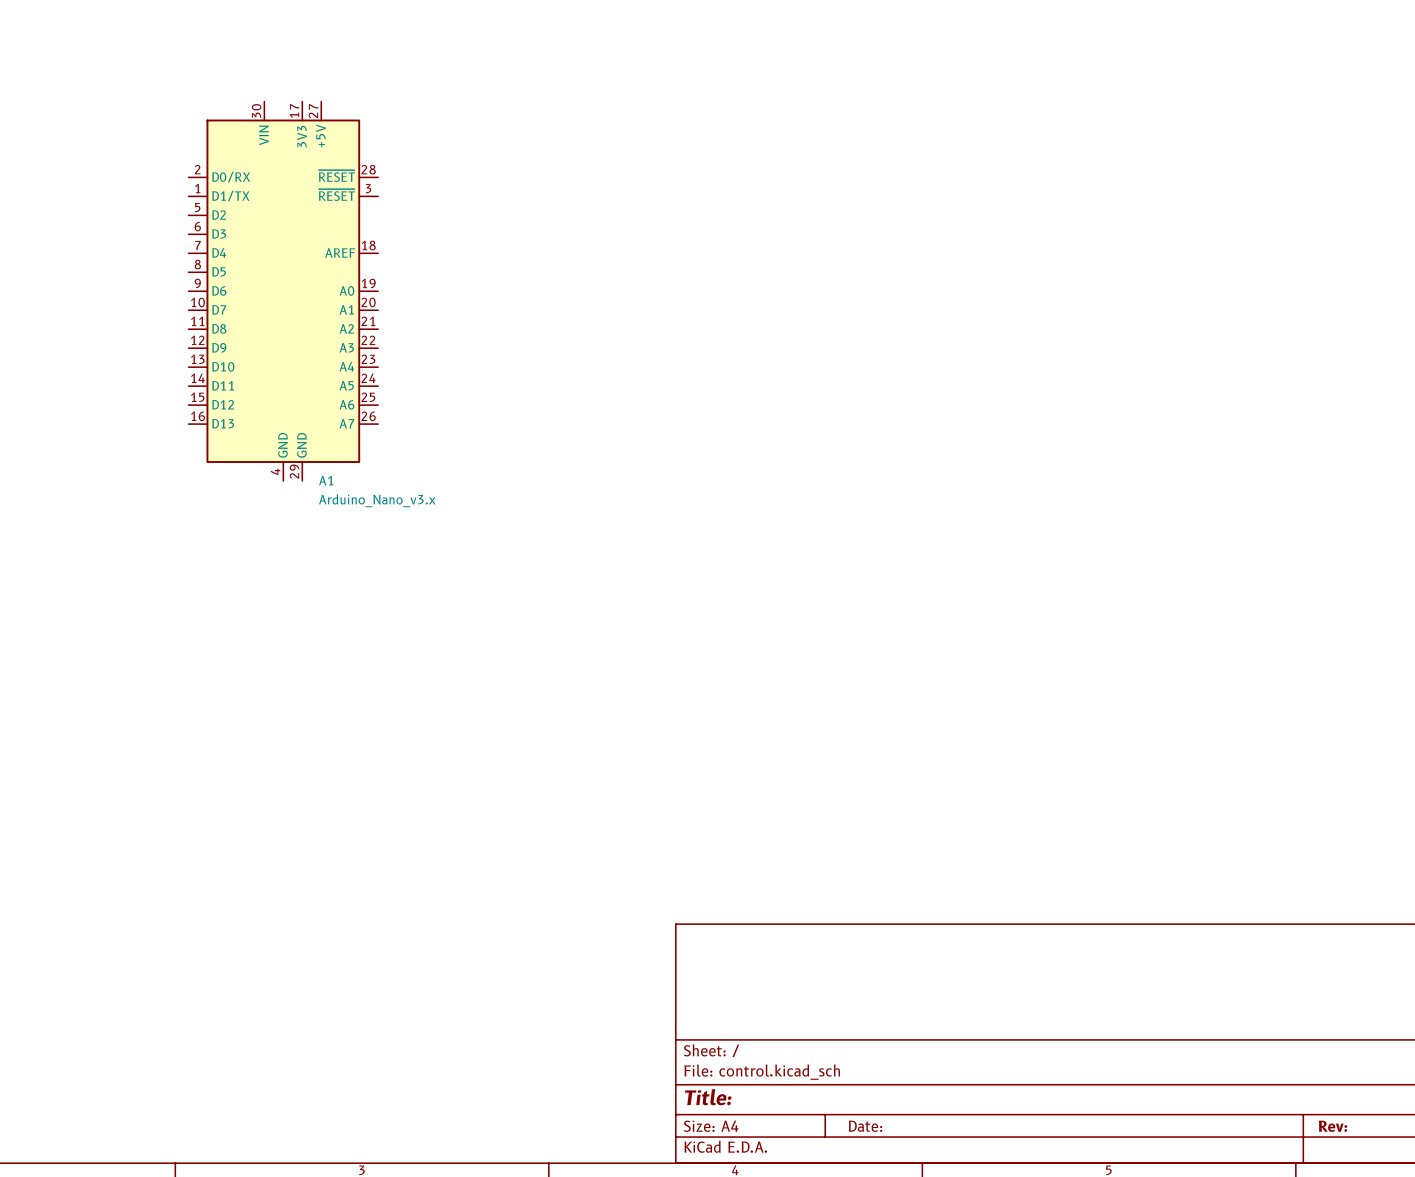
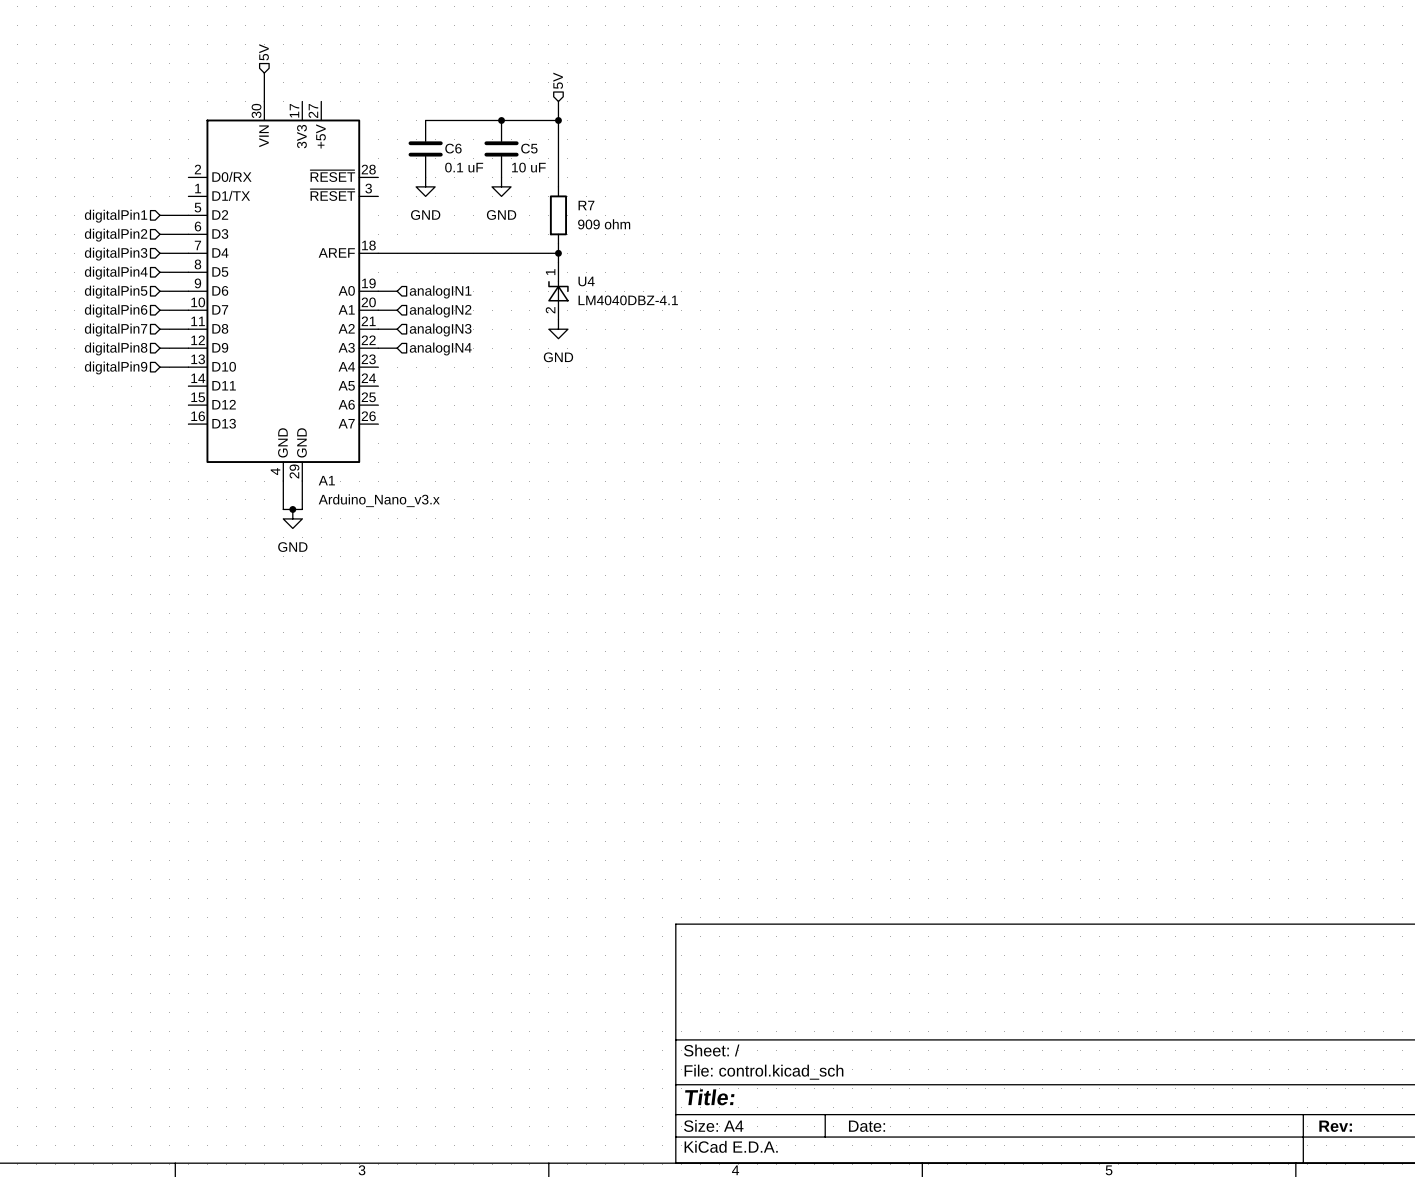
hierarchical label: none -> 5V (264, 52)
wire: none -> (264, 73) (264, 101)
hierarchical label: none -> 5V (558, 80)
wire: none -> (558, 101) (558, 186)
wire: none -> (425, 120) (558, 120)
junction: none -> (501, 120)
junction: none -> (558, 120)
C6: none -> 0.1 uF (425, 148)
C5: none -> 10 uF (501, 148)
power symbol: none -> GND (425, 186)
power symbol: none -> GND (501, 186)
wire: none -> (159, 215) (188, 215)
R7: none -> 909 ohm (558, 215)
hierarchical label: none -> digitalPin1 (116, 216)
wire: none -> (159, 234) (188, 234)
hierarchical label: none -> digitalPin2 (116, 235)
wire: none -> (558, 243) (558, 262)
wire: none -> (159, 253) (188, 253)
wire: none -> (378, 253) (558, 253)
junction: none -> (558, 253)
hierarchical label: none -> digitalPin3 (116, 254)
wire: none -> (159, 272) (188, 272)
hierarchical label: none -> digitalPin4 (116, 273)
wire: none -> (159, 291) (188, 291)
wire: none -> (378, 291) (397, 291)
U4: none -> LM4040DBZ-4.1 (558, 291)
hierarchical label: none -> digitalPin5 (116, 292)
hierarchical label: none -> analogIN1 (440, 292)
wire: none -> (159, 310) (188, 310)
wire: none -> (378, 310) (397, 310)
hierarchical label: none -> digitalPin6 (116, 311)
hierarchical label: none -> analogIN2 (440, 311)
wire: none -> (159, 329) (188, 329)
wire: none -> (378, 329) (397, 329)
power symbol: none -> GND (558, 329)
hierarchical label: none -> digitalPin7 (116, 330)
hierarchical label: none -> analogIN3 (440, 330)
wire: none -> (159, 348) (188, 348)
wire: none -> (378, 348) (397, 348)
hierarchical label: none -> digitalPin8 (116, 349)
hierarchical label: none -> analogIN4 (440, 349)
wire: none -> (159, 367) (188, 367)
hierarchical label: none -> digitalPin9 (116, 367)
wire: none -> (283, 481) (283, 509) (302, 509) (302, 481)
junction: none -> (292, 509)
power symbol: none -> GND (292, 518)

